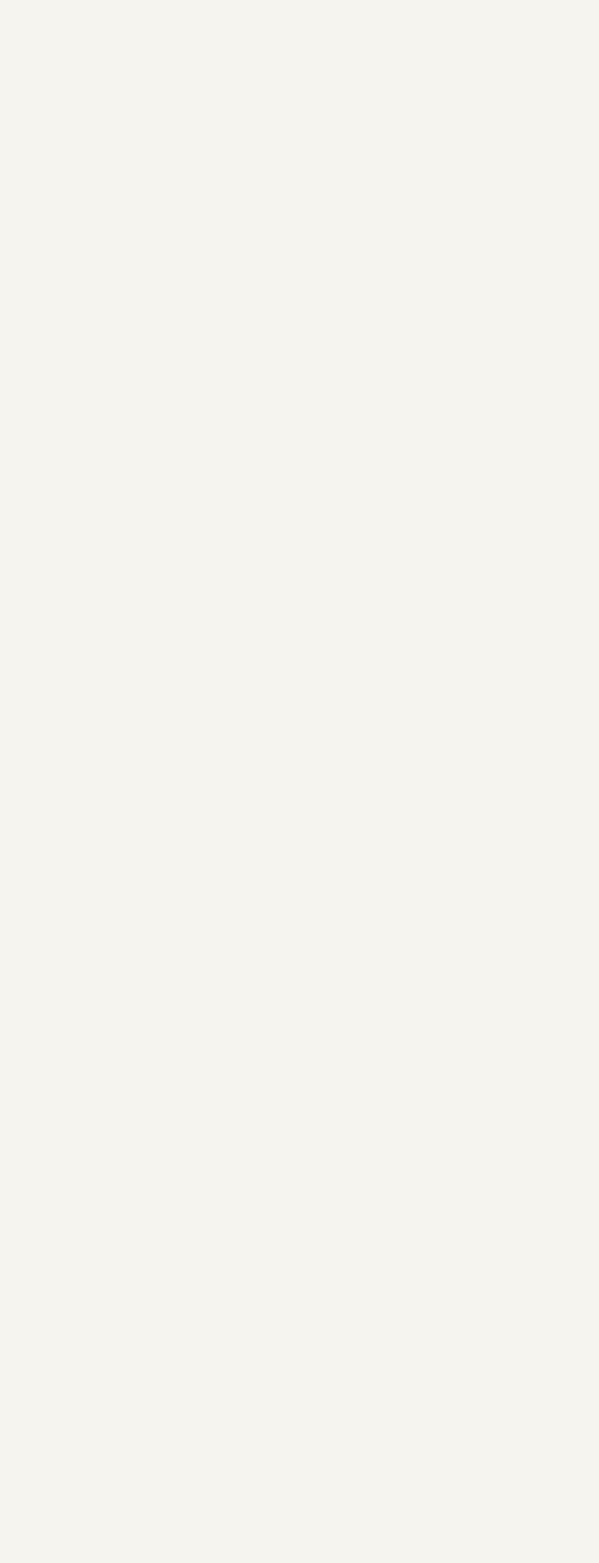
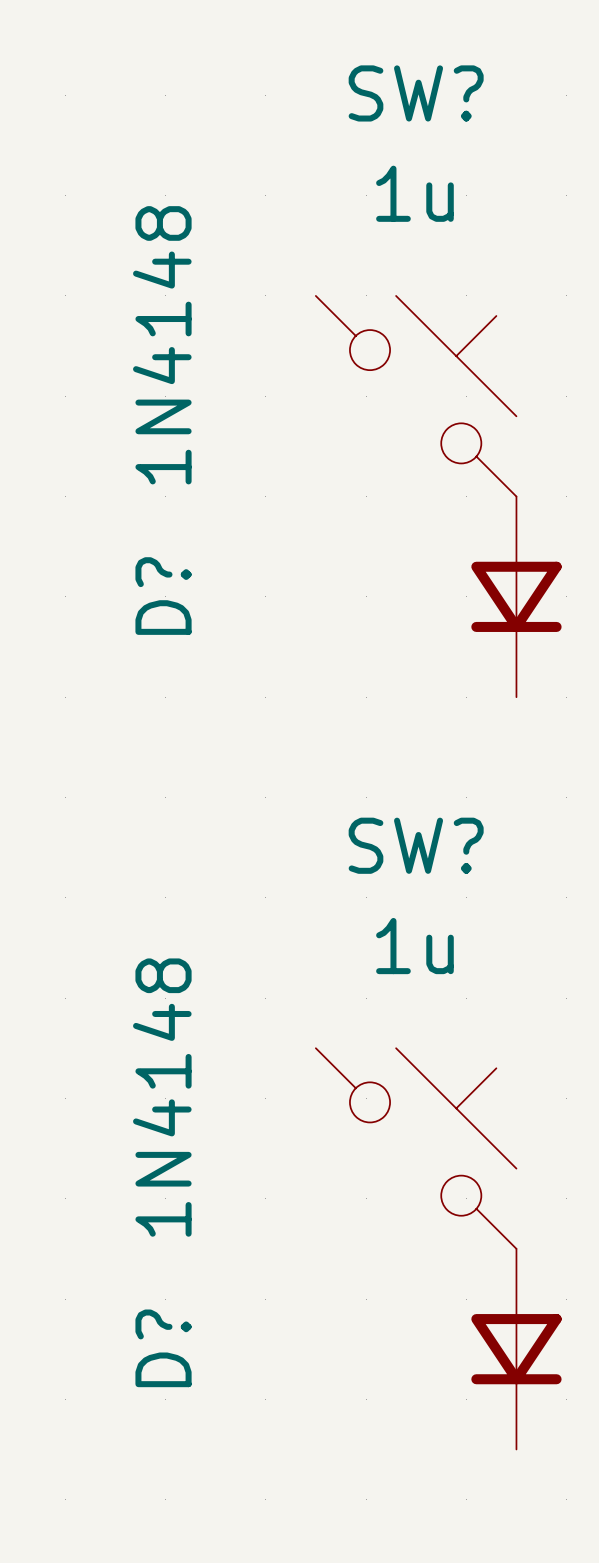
SW?: none -> 1u (416, 396)
D?: none -> 1N4148 (516, 596)
SW?: none -> 1u (416, 1148)
D?: none -> 1N4148 (516, 1349)

